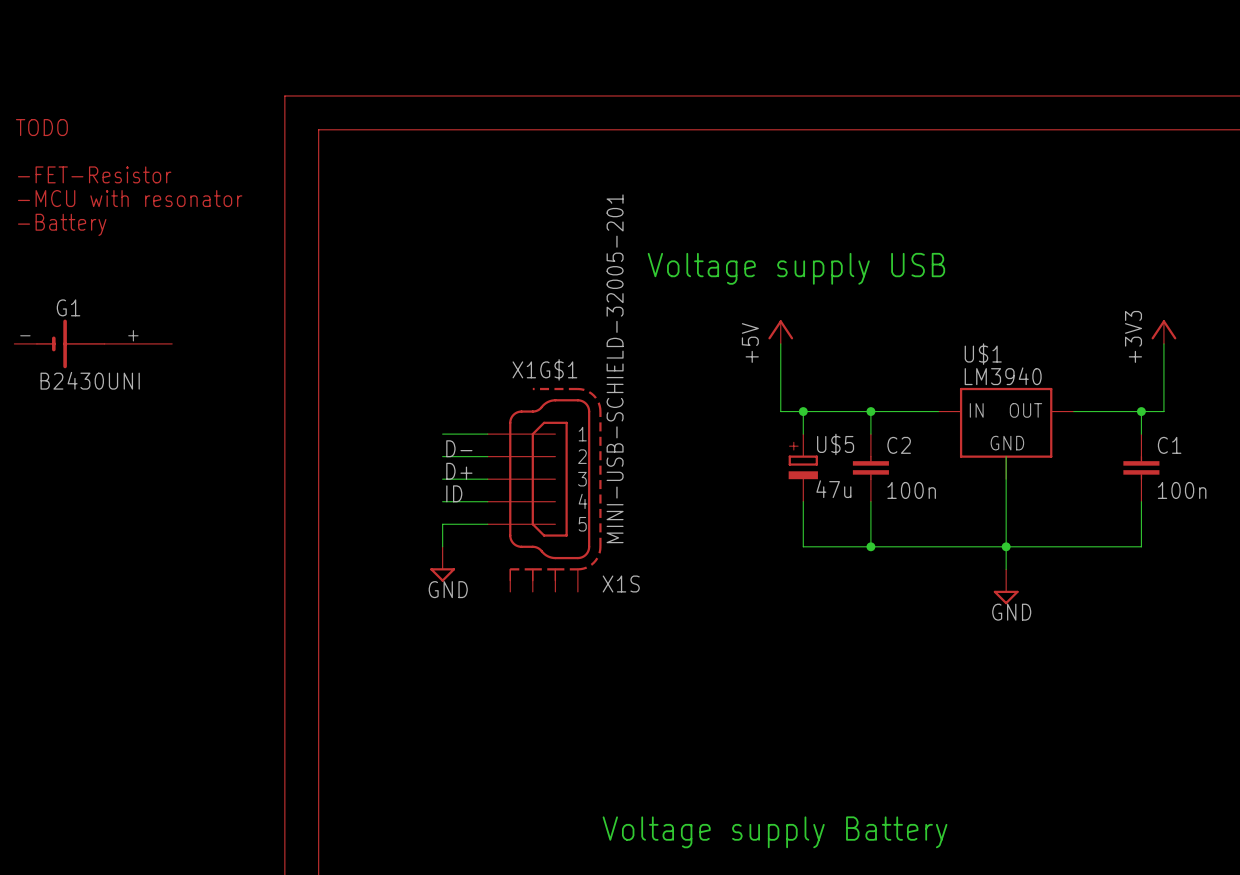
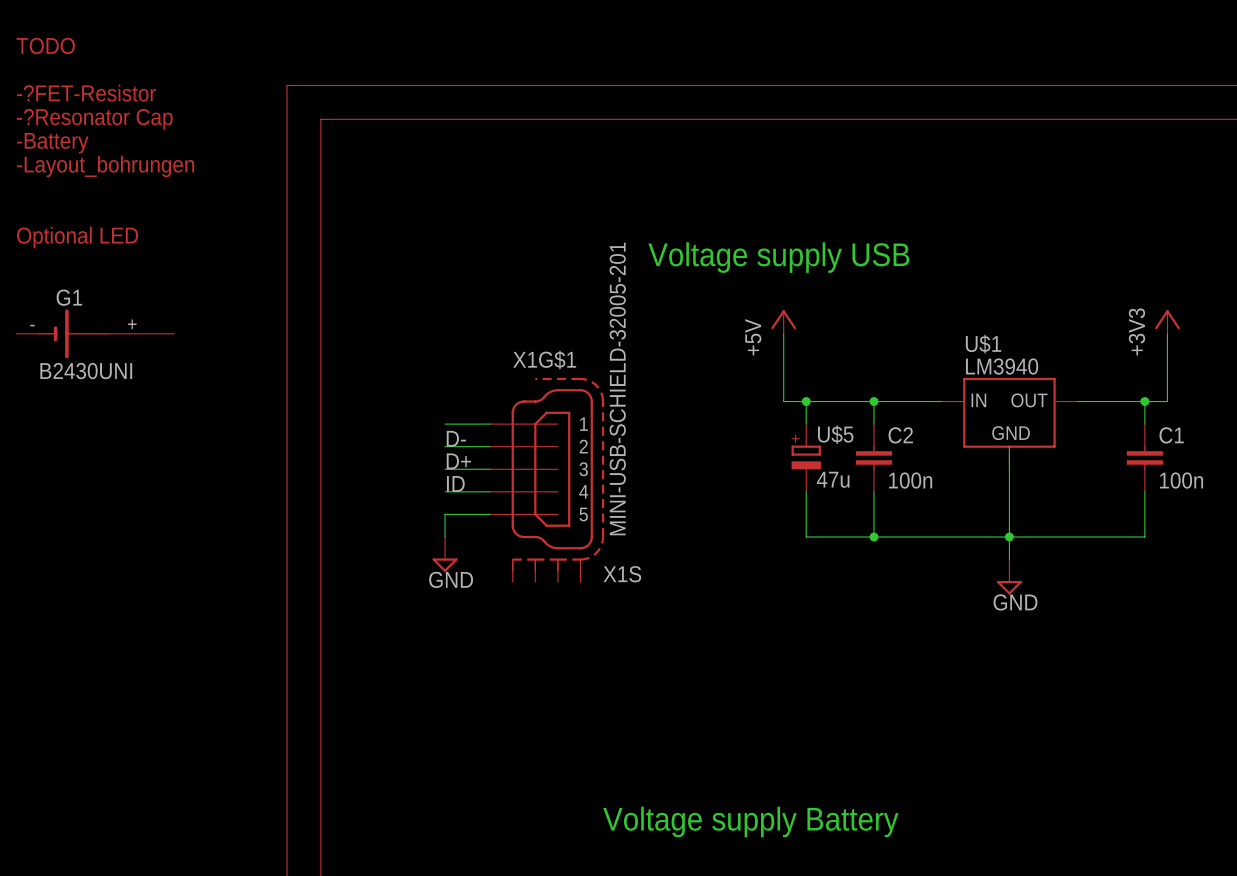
text: none -> TODO (45, 45)
text: none -> -?FET-Resistor (86, 93)
text: TODO (41, 127) -> -?Resonator Cap (94, 119)
text: -FET-Resistor (94, 174) -> -Layout_bohrungen (105, 166)
text: -MCU with resonator (130, 198) -> none
text position: -Battery (62, 224) -> -Battery (52, 143)
text: none -> Optional LED (77, 237)

